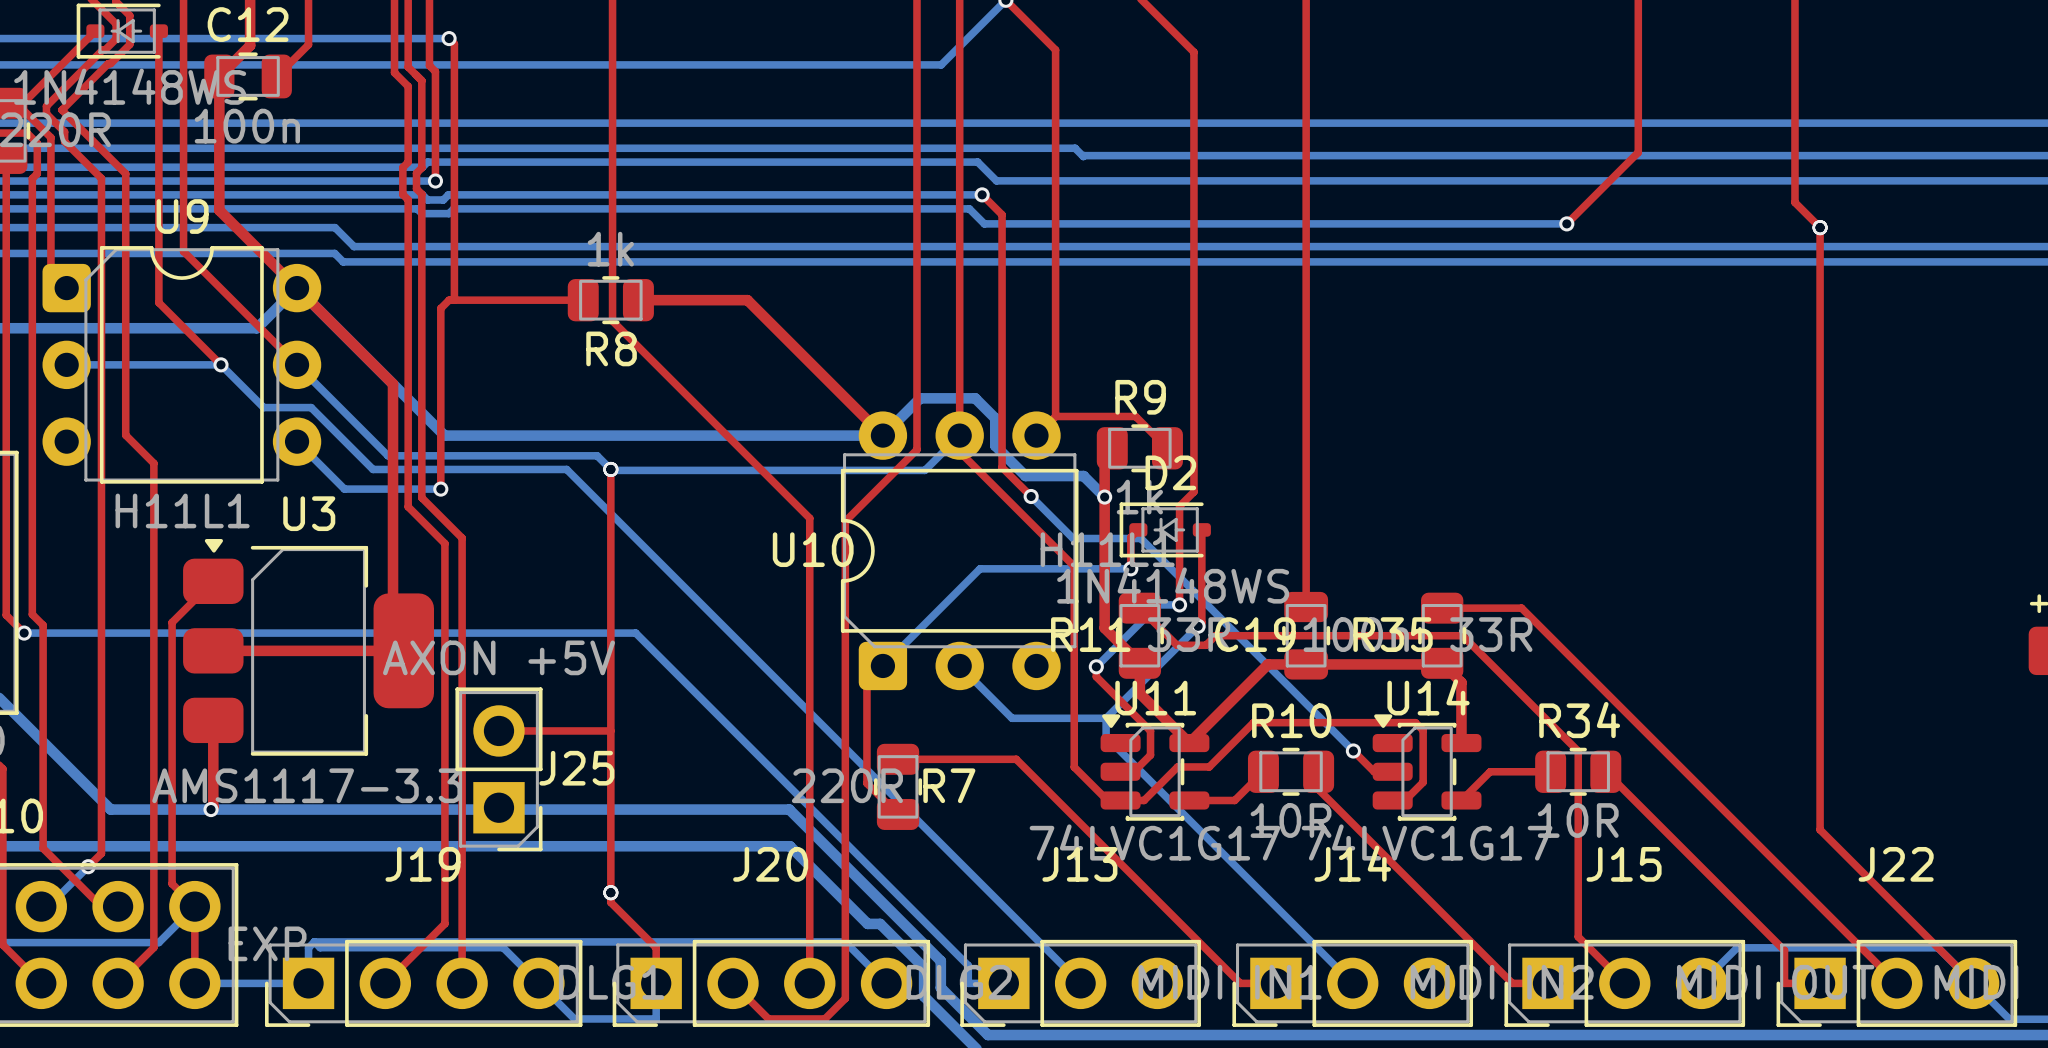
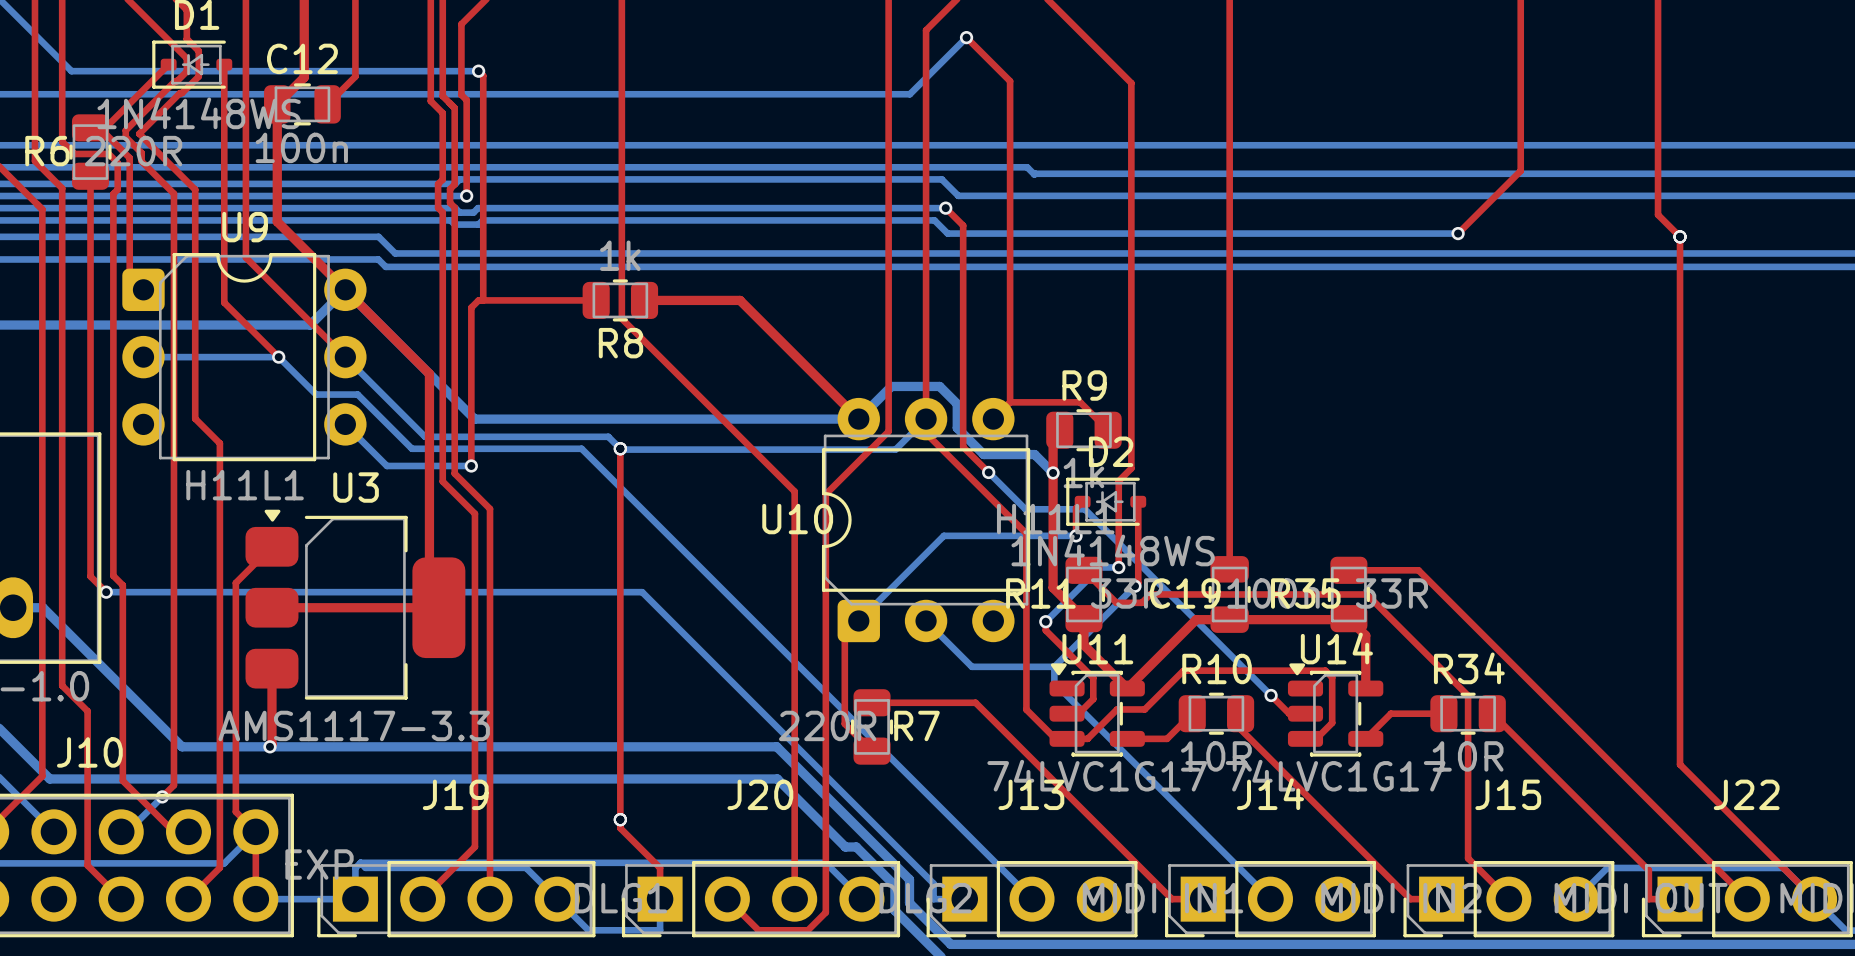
top track: (498, 730) (610, 730) -> none
J25: AXON +5V (498, 769) -> none

